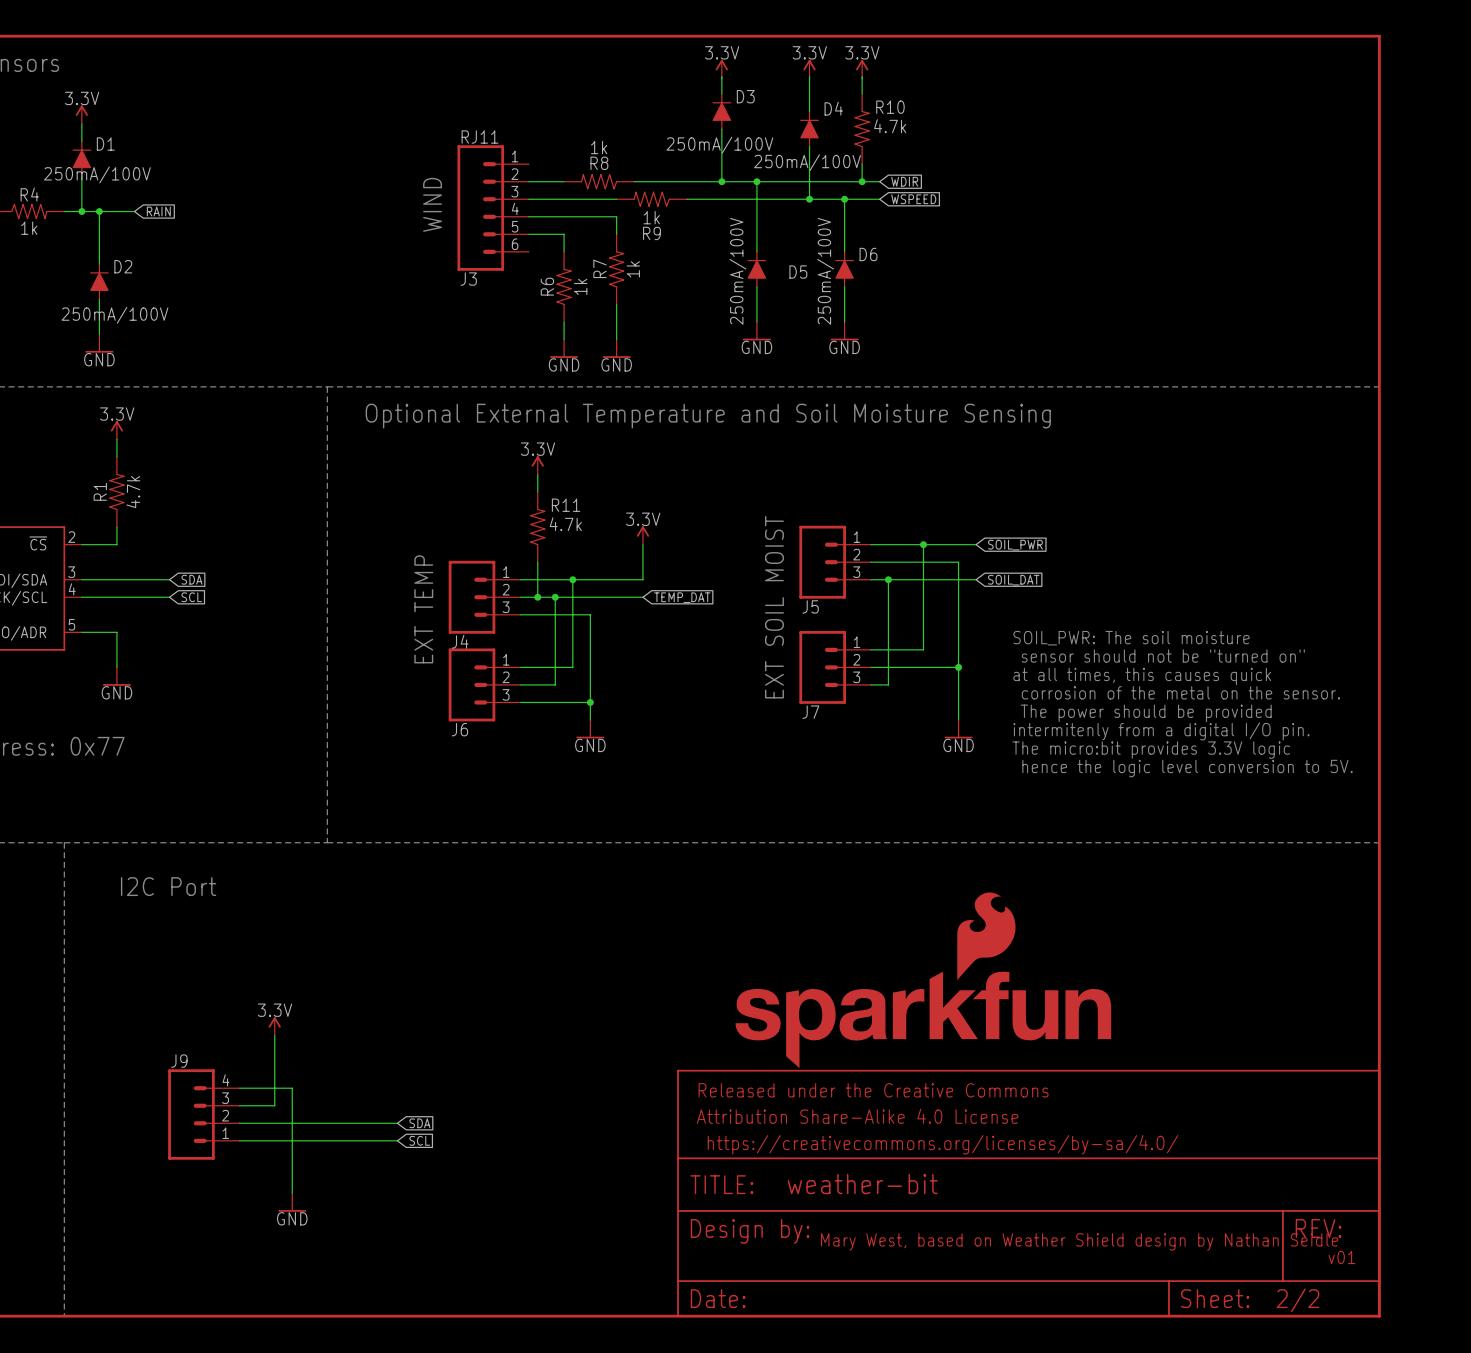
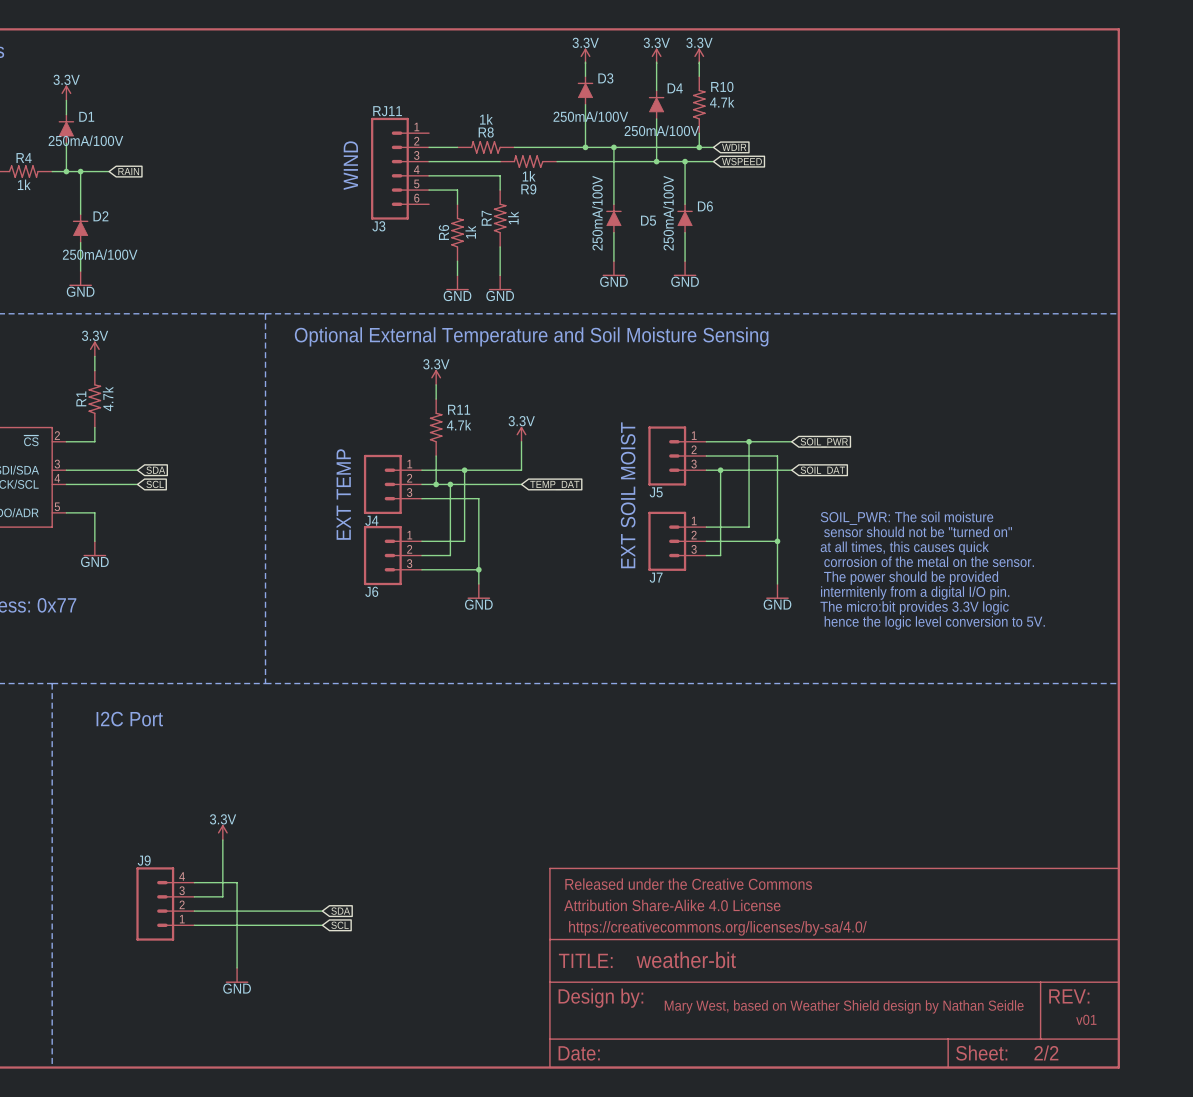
part: (923, 980) -> none

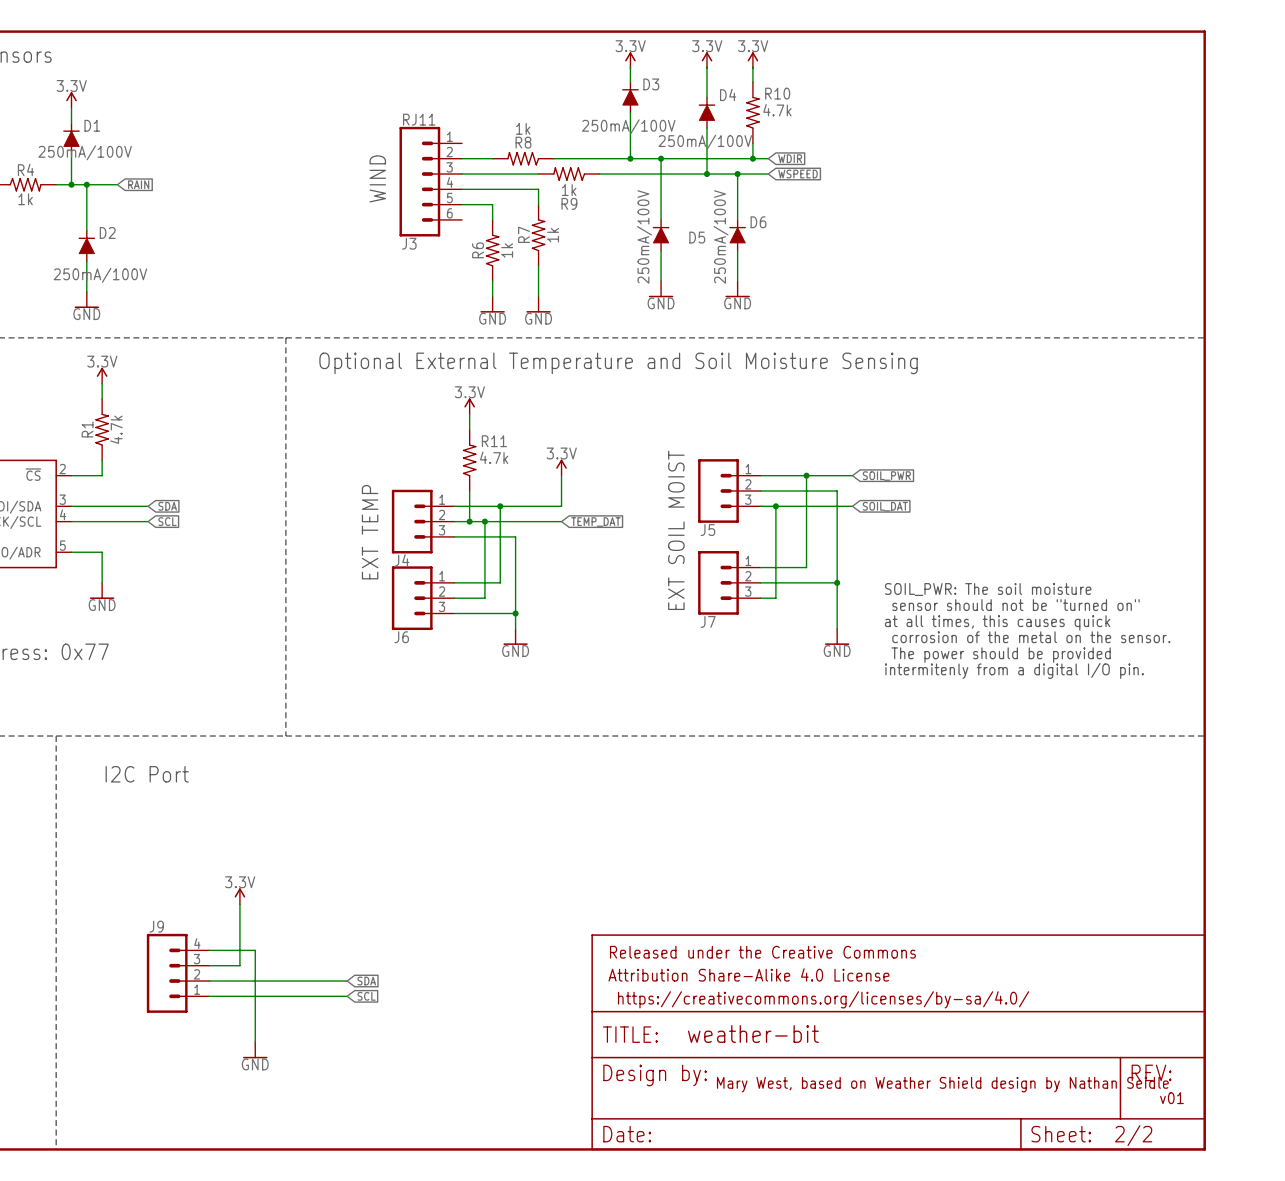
text: SOIL_PWR: The soil moisture (907, 518) -> none
text: sensor should not be "turned on" (918, 531) -> none
text: at all times, this causes quick (904, 548) -> SOIL_PWR: The soil moisture (988, 589)
text: corrosion of the metal on the sensor. (929, 561) -> sensor should not be "turned on" (1015, 605)
text: The power should be provided (911, 578) -> at all times, this causes quick (997, 622)
text: intermitenly from a digital I/O pin. (915, 593) -> corrosion of the metal on the sensor. (1031, 637)
text: The micro:bit provides 3.3V logic (914, 607) -> The power should be provided (1001, 655)
text: hence the logic level conversion to 5V. (934, 622) -> intermitenly from a digital I/O pin. (1014, 670)

